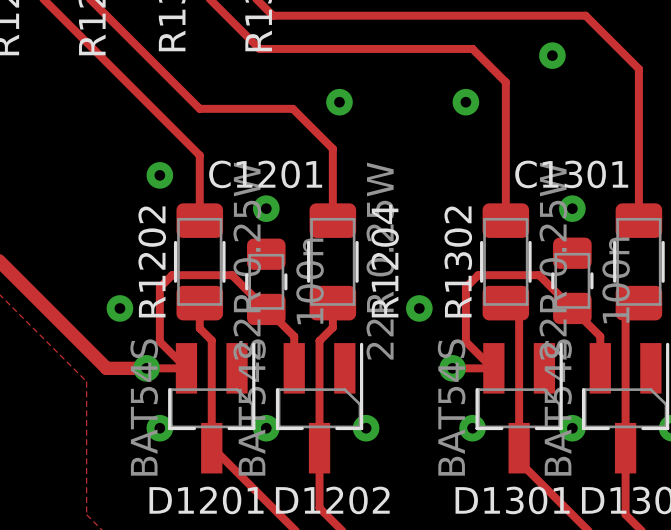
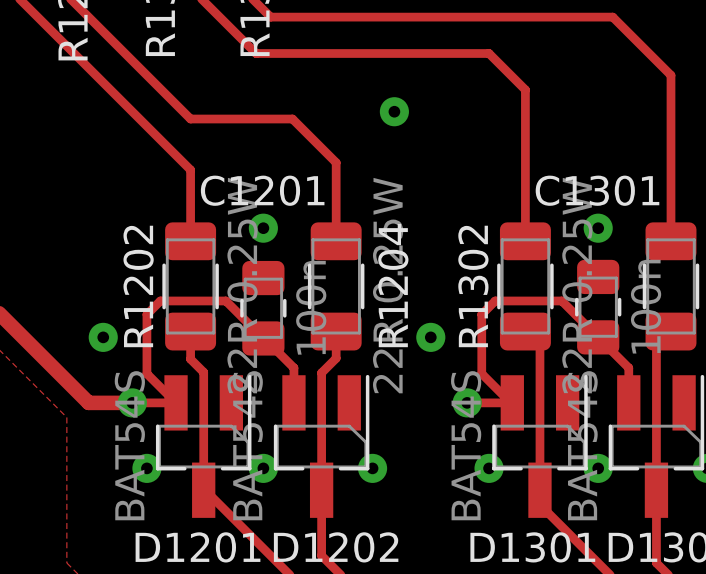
via: (552, 55) -> none
via: (339, 102) -> none
via: none -> (394, 111)
via: (465, 102) -> none
via: (159, 175) -> none

